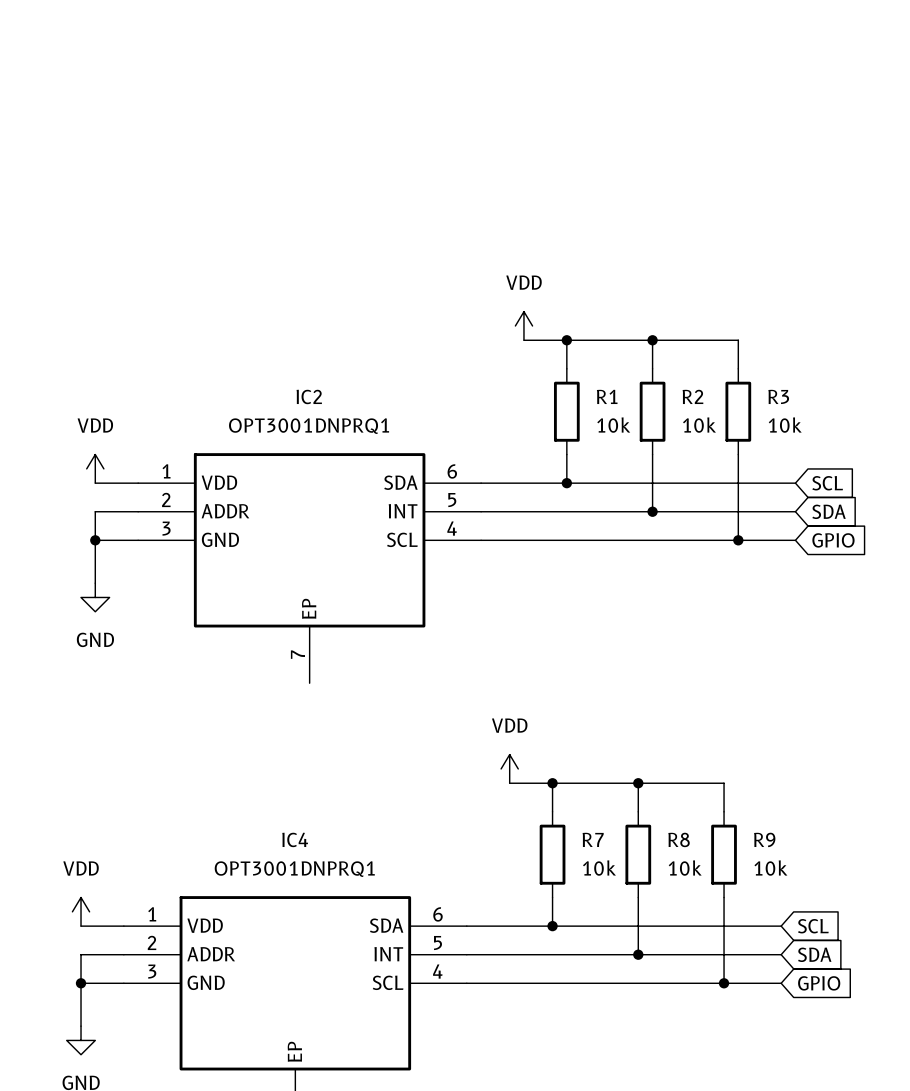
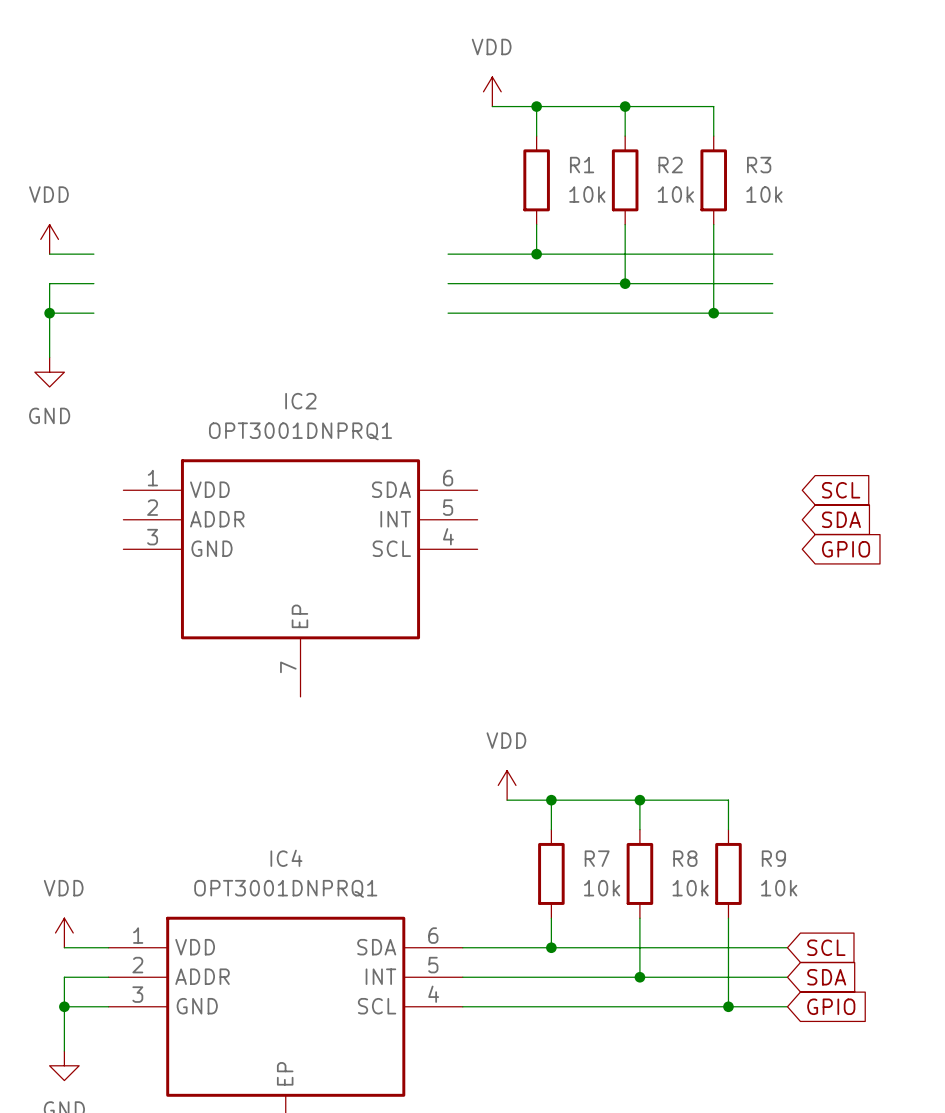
junction: none -> (536, 106)
junction: none -> (625, 106)
junction: none -> (536, 254)
junction: none -> (625, 283)
junction: none -> (49, 313)
junction: none -> (713, 313)
power symbol position: VDD (523, 325) -> VDD (492, 91)
wire: (523, 340) (738, 340) (738, 368) -> (492, 106) (713, 106) (713, 136)
wire: (566, 340) (566, 368) -> (536, 106) (536, 136)
junction: (566, 340) -> none
wire: (652, 340) (652, 368) -> (625, 106) (625, 136)
junction: (652, 340) -> none
R1 position: (566, 411) -> (536, 180)
R2 position: (652, 411) -> (625, 180)
R3 position: (738, 411) -> (713, 180)
wire: (566, 454) (566, 483) -> (536, 224) (536, 254)
wire: (652, 454) (652, 511) -> (625, 224) (625, 283)
wire: (738, 454) (738, 540) -> (713, 224) (713, 313)
power symbol position: VDD (95, 468) -> VDD (49, 239)
wire: (95, 483) (138, 483) -> (49, 254) (93, 254)
wire: (481, 483) (795, 483) -> (448, 254) (772, 254)
junction: (566, 483) -> none
wire: (138, 511) (95, 511) (95, 583) -> (93, 283) (49, 283) (49, 357)
wire: (481, 511) (795, 511) -> (448, 283) (772, 283)
junction: (652, 511) -> none
wire: (95, 540) (138, 540) -> (49, 313) (93, 313)
junction: (95, 540) -> none
wire: (481, 540) (795, 540) -> (448, 313) (772, 313)
junction: (738, 540) -> none
power symbol position: GND (95, 597) -> GND (49, 372)

